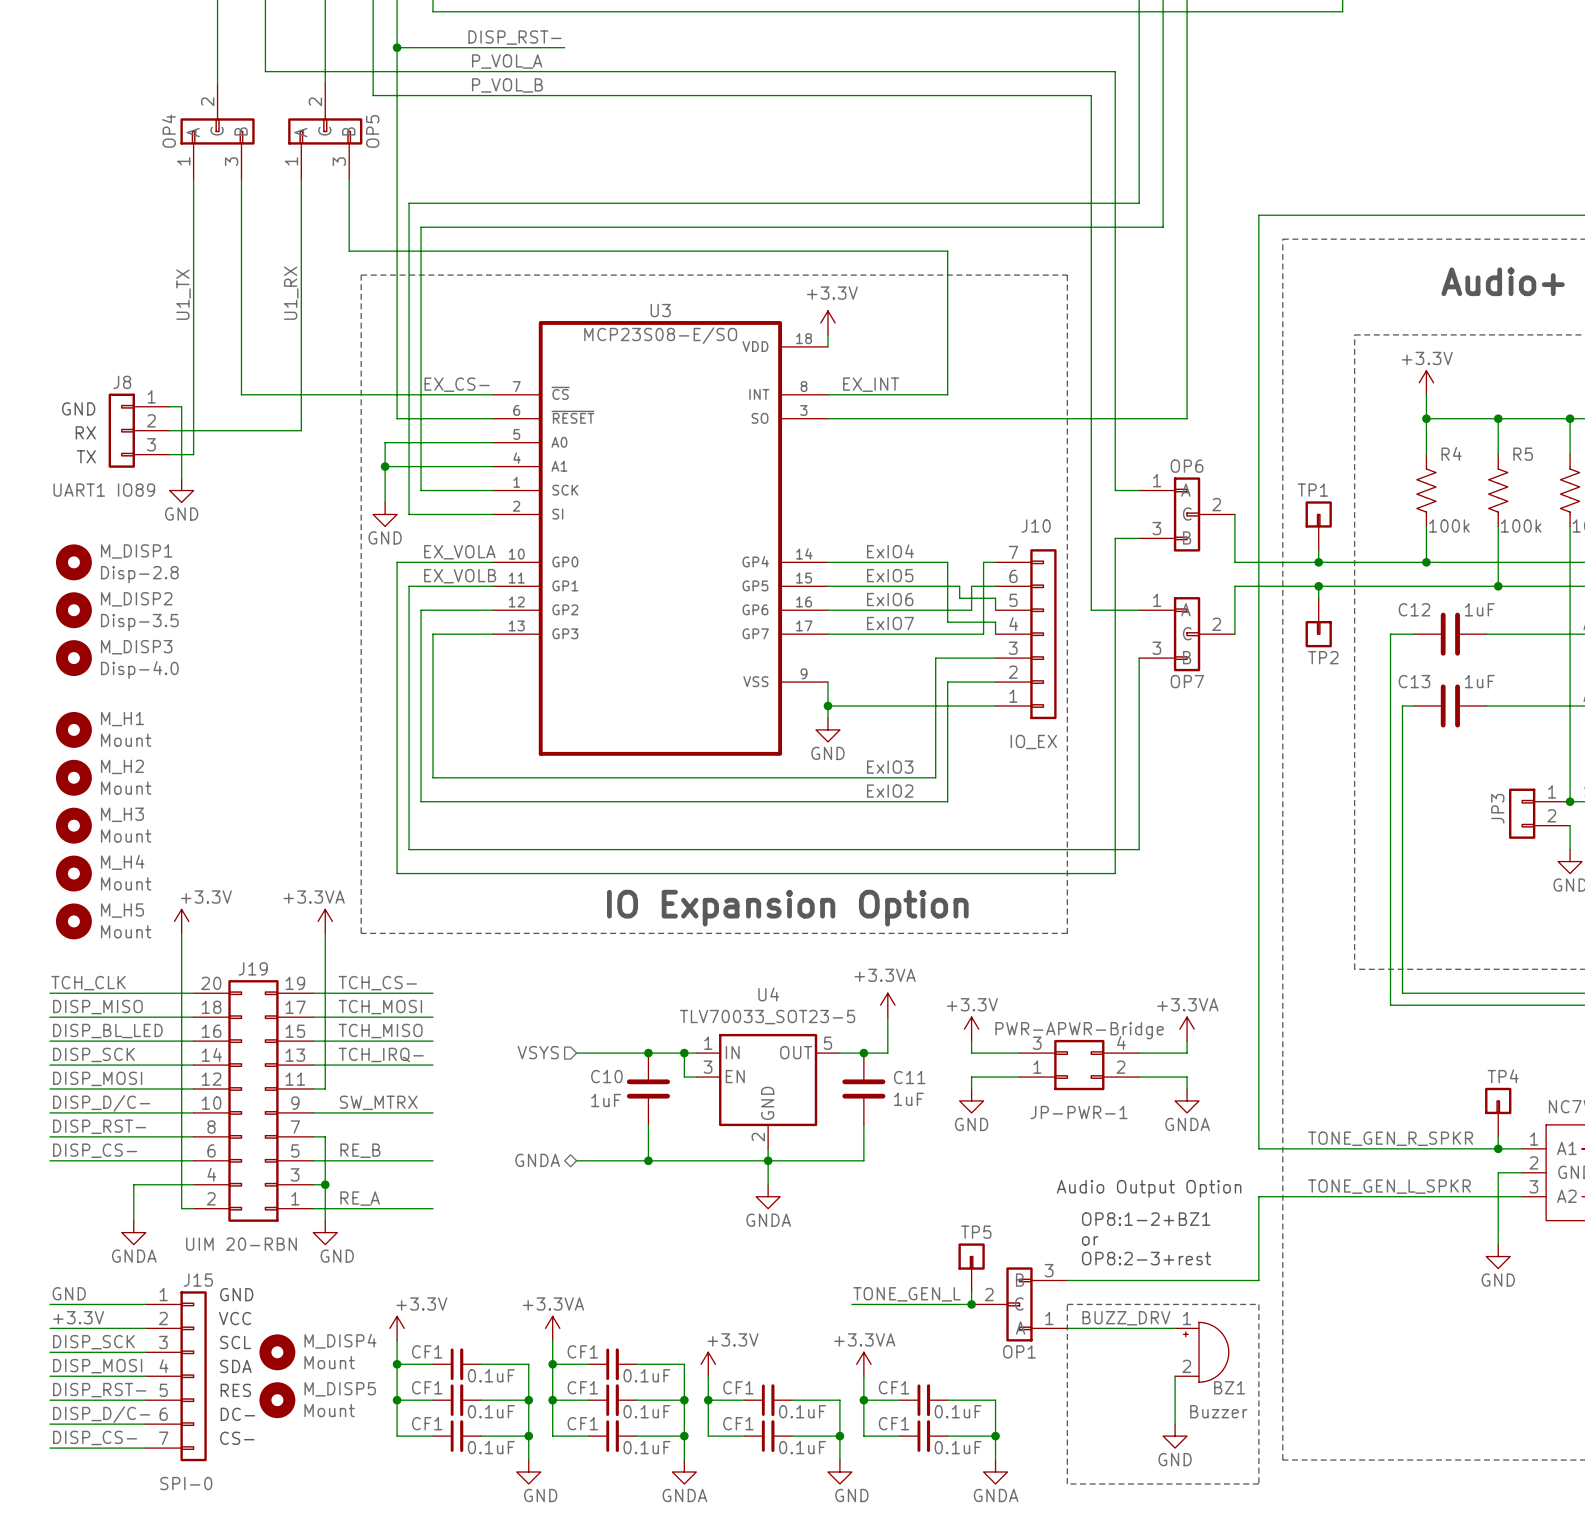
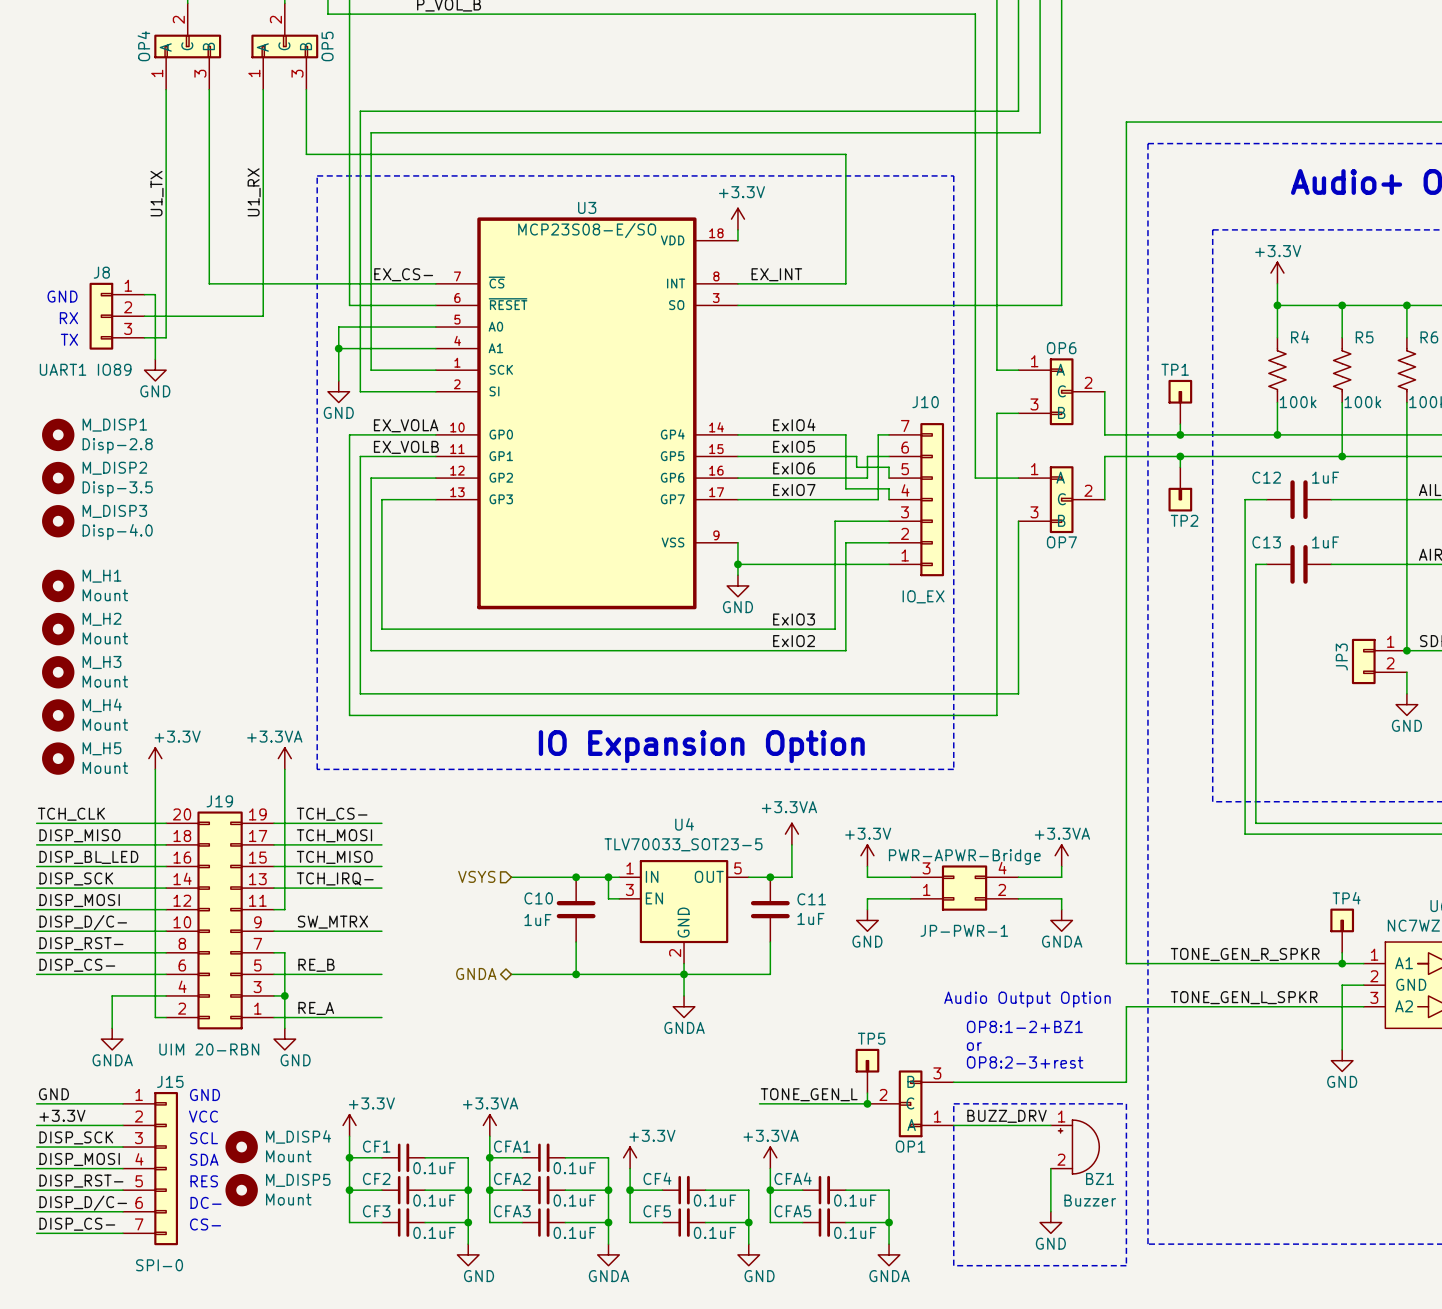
CF1 name: CF1 (582, 1351) -> CFA1 (512, 1146)
CF1 name: CF1 (427, 1387) -> CF2 (376, 1178)
CF1 name: CF1 (582, 1387) -> CFA2 (512, 1178)
CF1 name: CF1 (738, 1387) -> CF4 (657, 1178)
CF1 name: CF1 (894, 1387) -> CFA4 (793, 1178)
CF1 name: CF1 (427, 1423) -> CF3 (376, 1211)
CF1 name: CF1 (582, 1423) -> CFA3 (512, 1211)
CF1 name: CF1 (738, 1423) -> CF5 (657, 1211)
CF1 name: CF1 (894, 1423) -> CFA5 (792, 1211)

